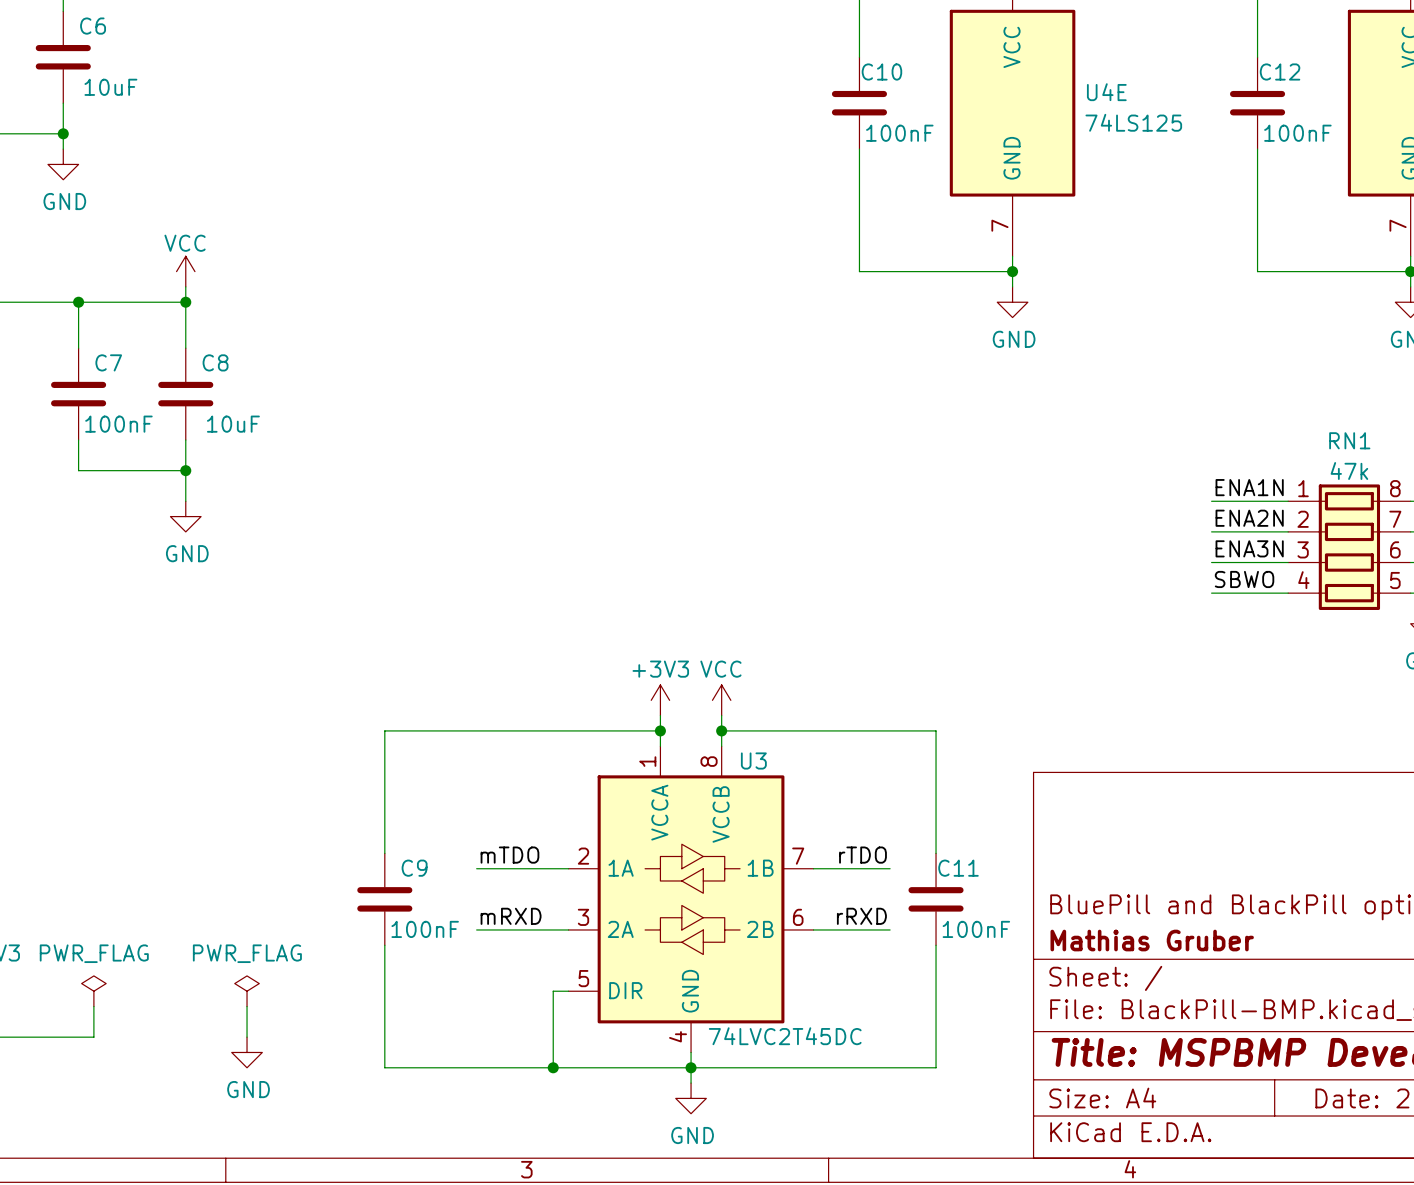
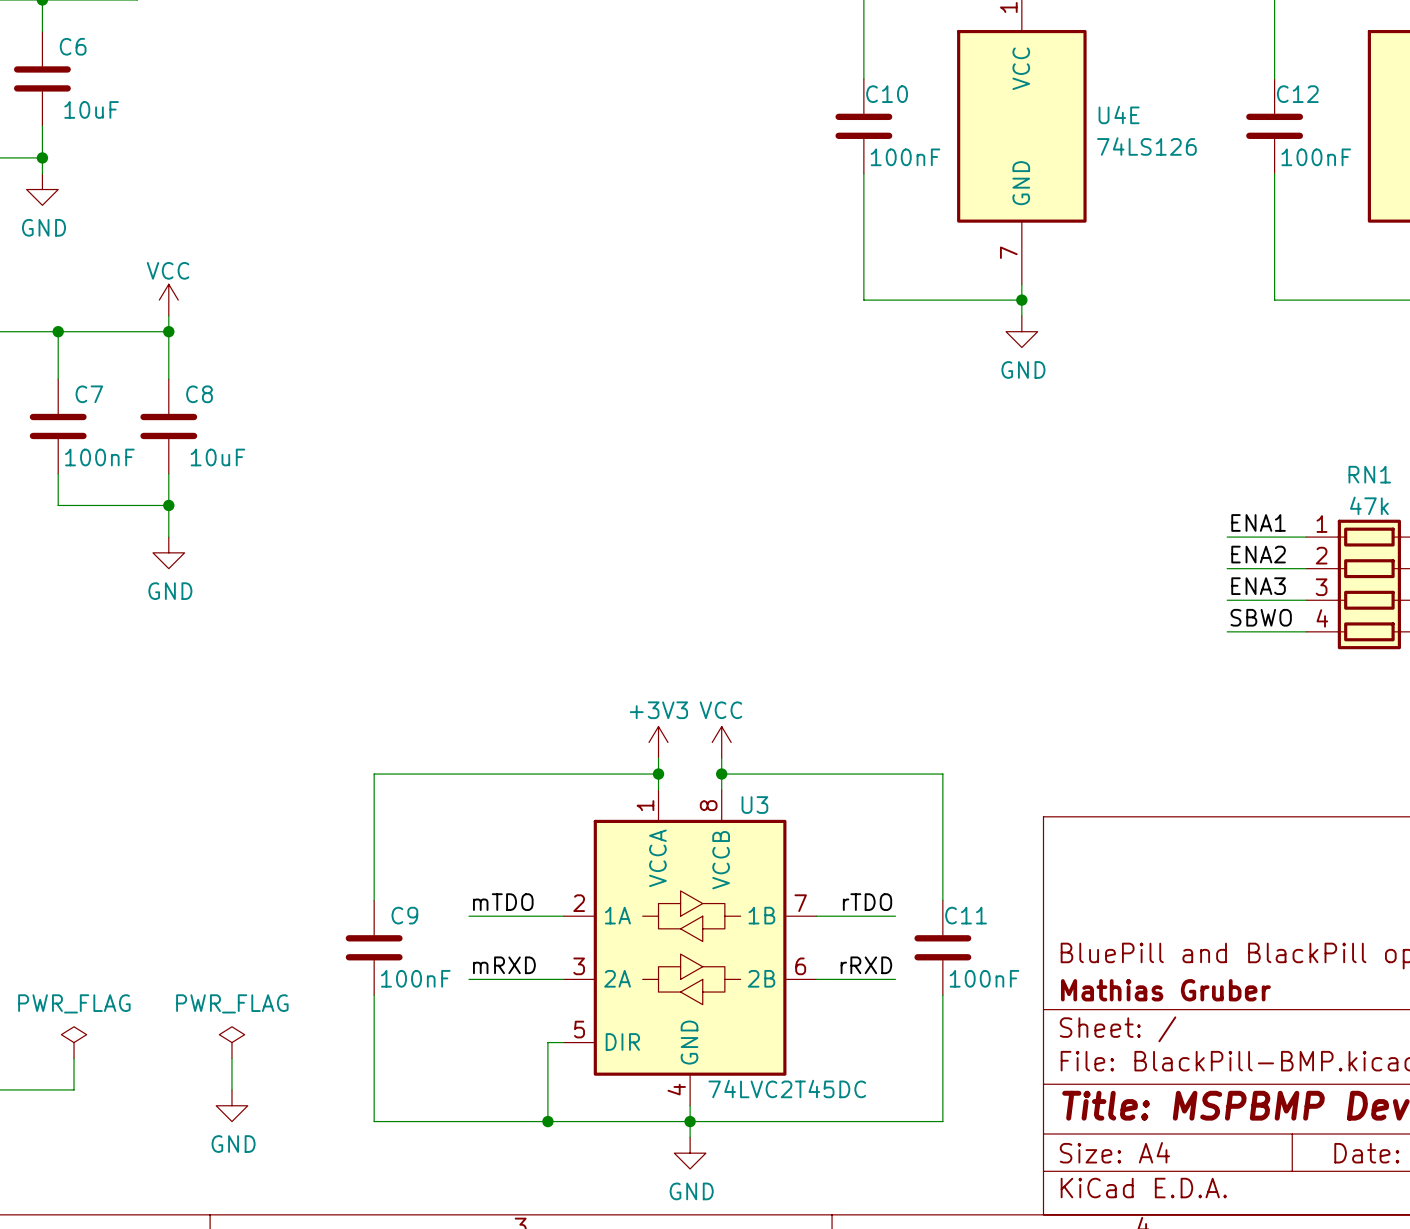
U4E value: 74LS125 (1133, 122) -> 74LS126 (1146, 146)
label: ENA1N (1249, 487) -> ENA1 (1258, 522)
label: ENA2N (1249, 518) -> ENA2 (1258, 554)
label: ENA3N (1249, 548) -> ENA3 (1258, 586)

